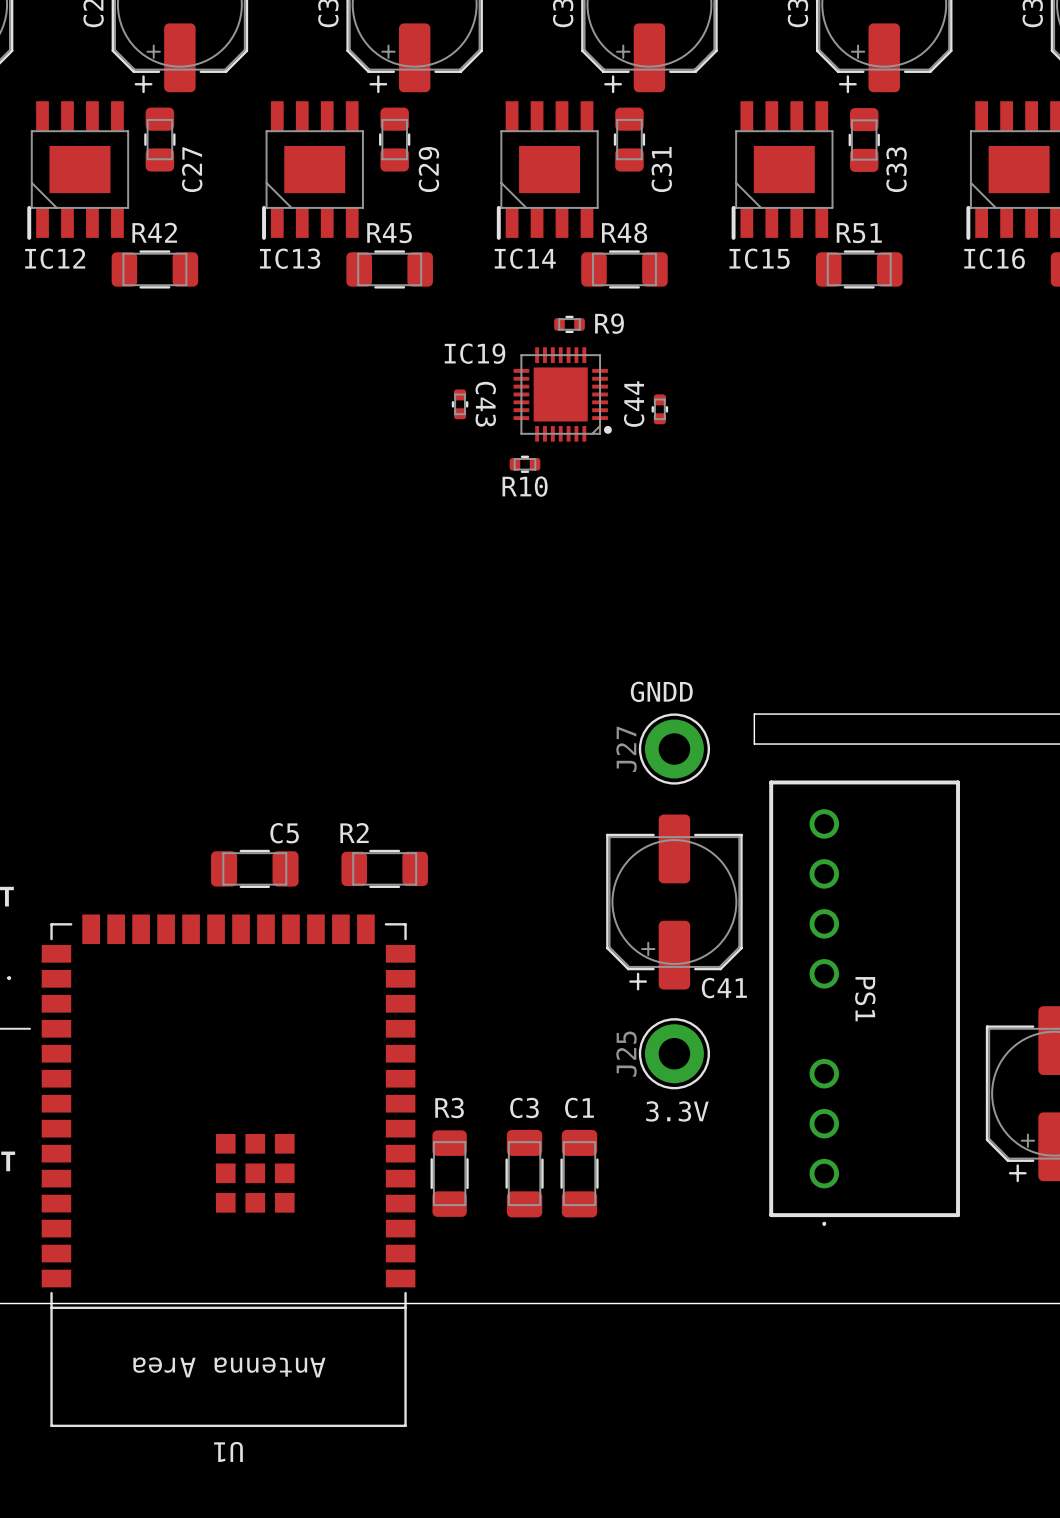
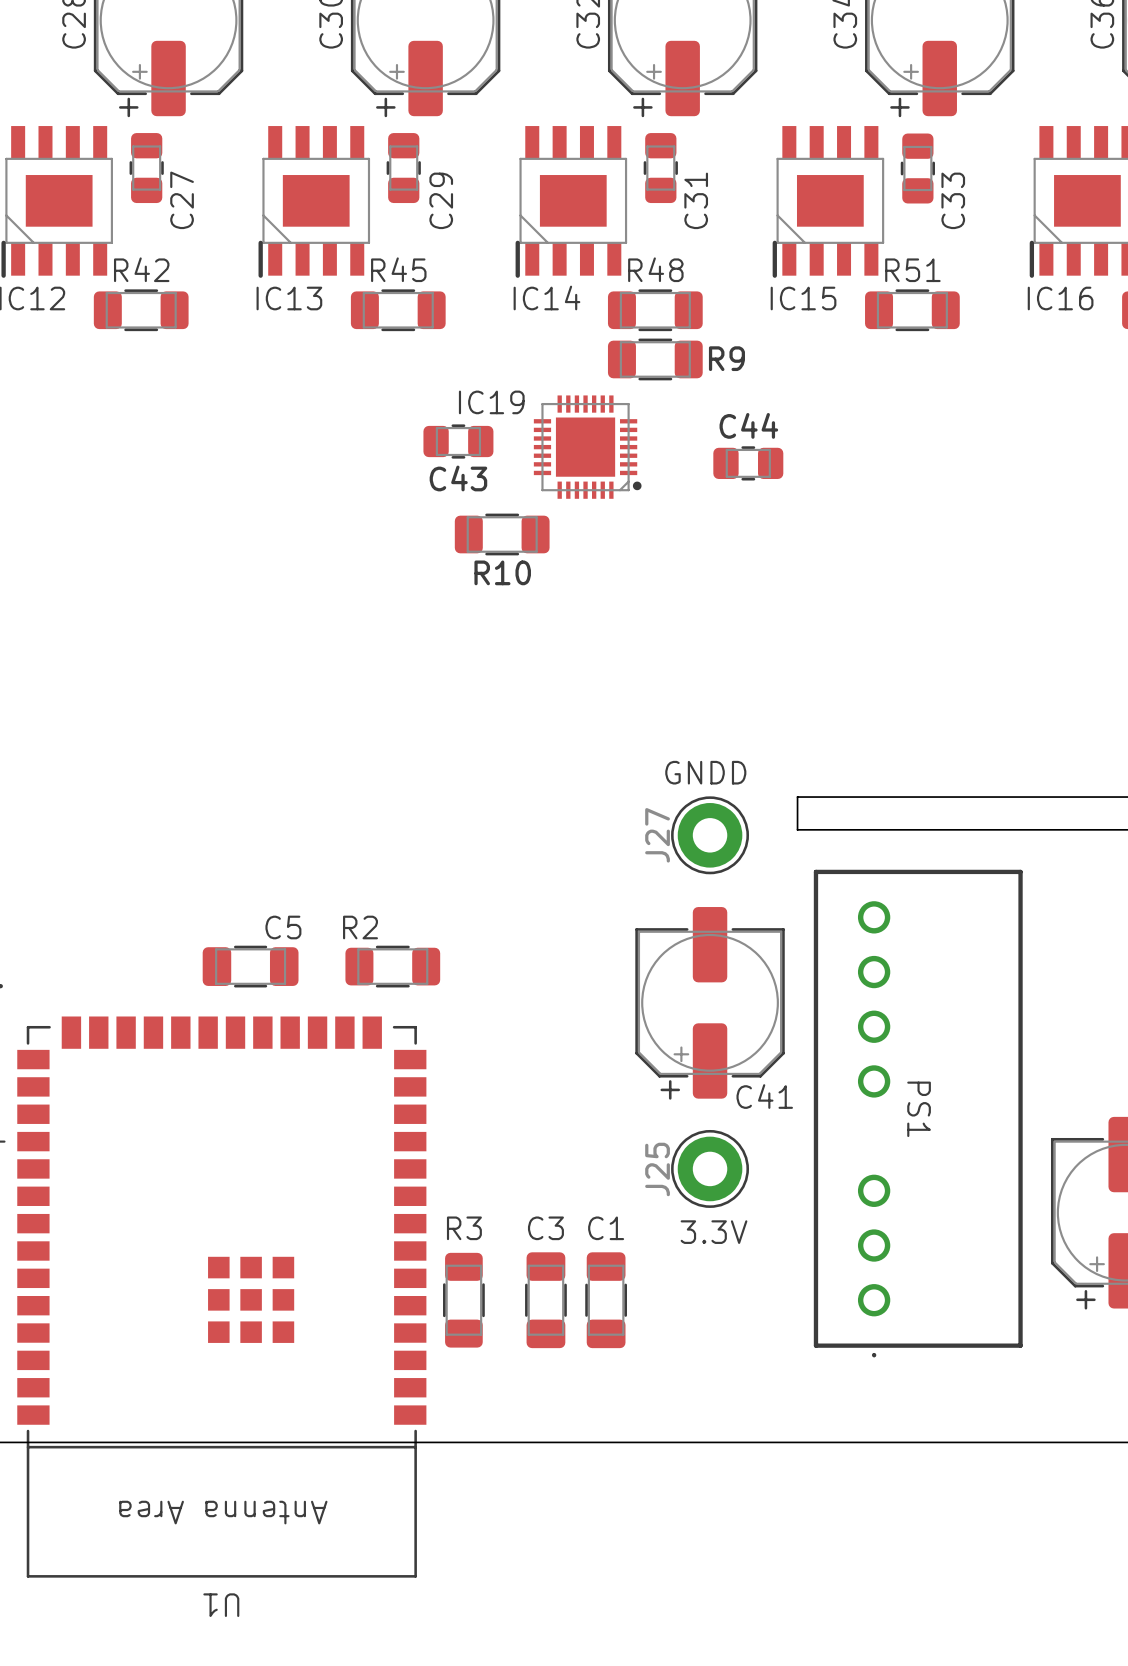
R9 footprint: [554, 315, 585, 334] -> [607, 338, 703, 381]
C43 footprint: [451, 389, 469, 420] -> [423, 424, 494, 459]
C44 footprint: [651, 394, 669, 425] -> [713, 446, 784, 481]
C43 name position: C43 (485, 404) -> C43 (458, 478)
R10 footprint: [509, 455, 541, 473] -> [454, 513, 550, 556]

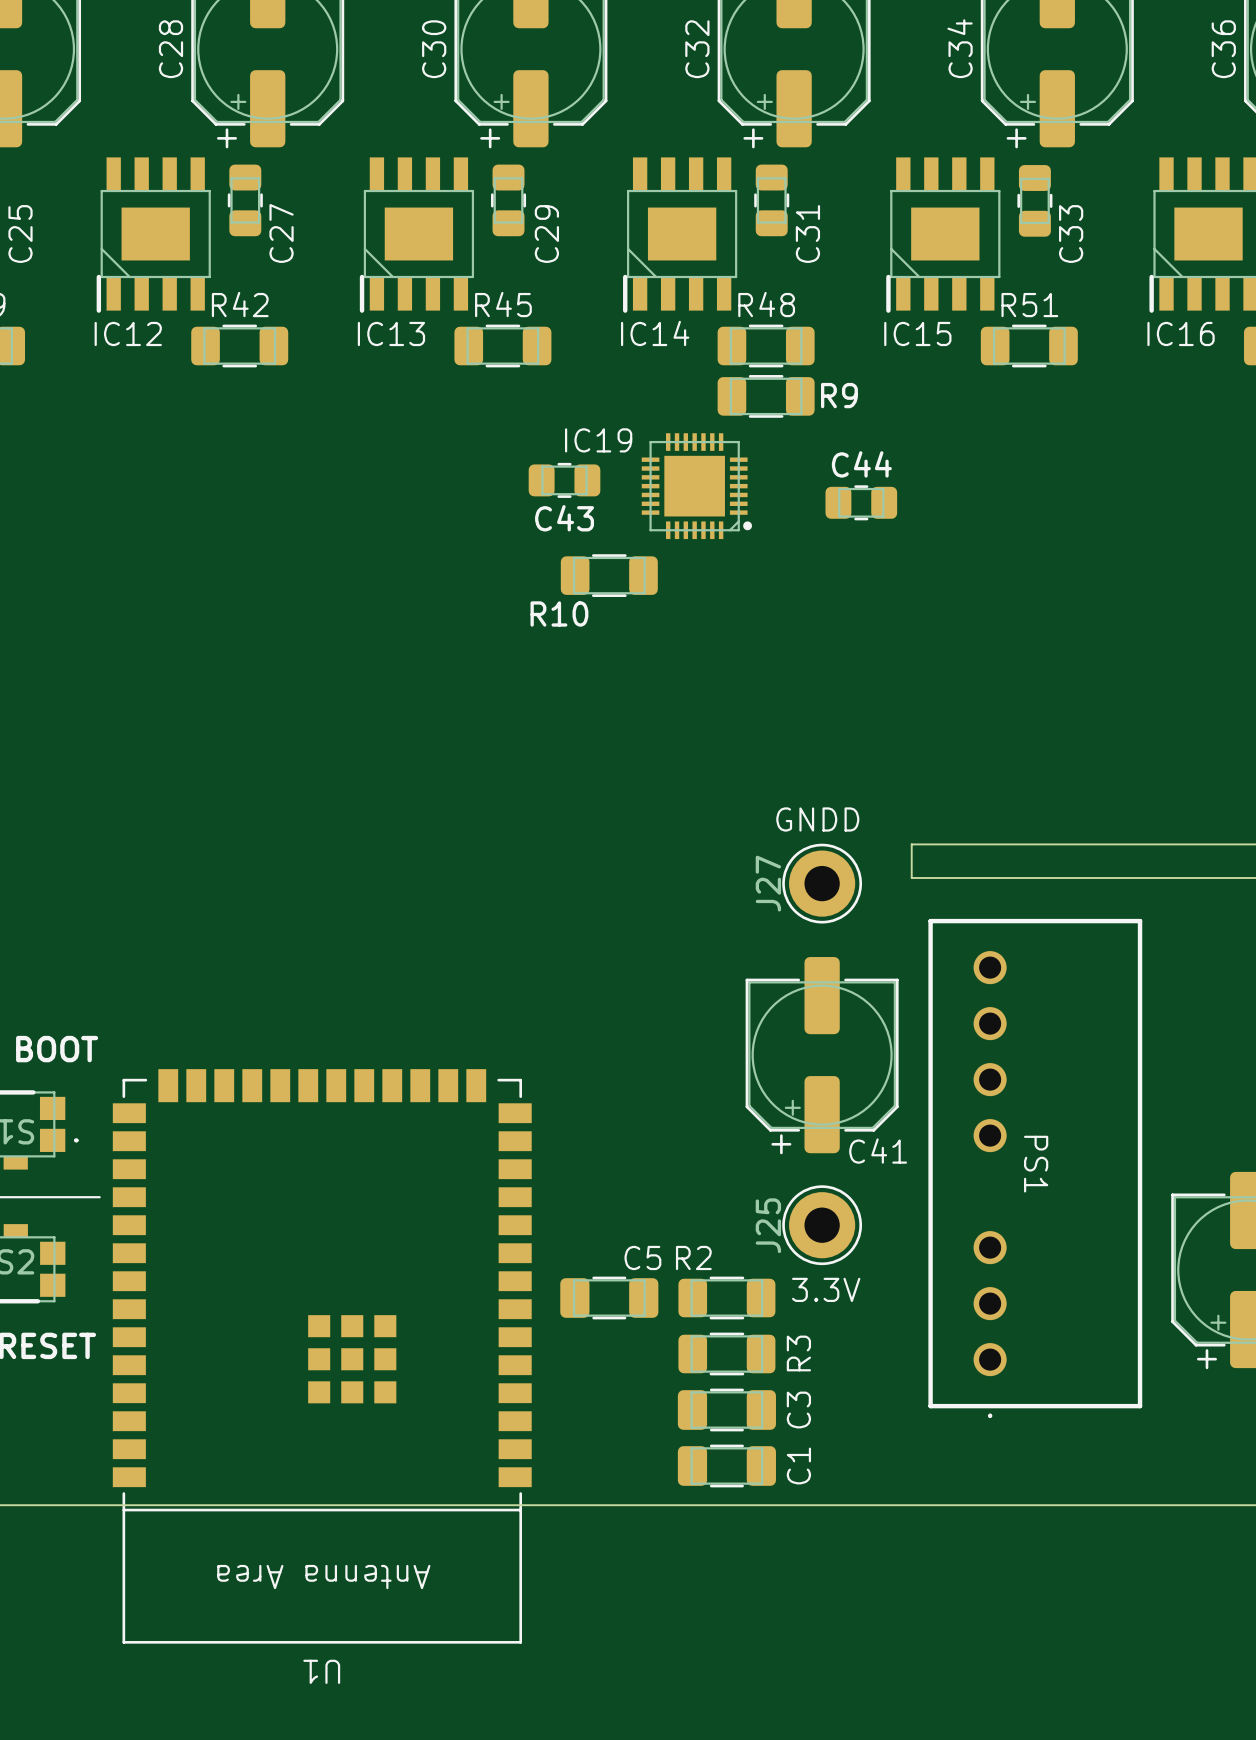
R10 name position: R10 (502, 572) -> R10 (559, 613)
C5 position: (250, 966) -> (609, 1298)
R2 position: (392, 966) -> (726, 1298)
R3 rotation: 0° (463, 1300) -> 90° clockwise (726, 1354)
R3 position: (463, 1300) -> (726, 1354)
C3 rotation: 0° (545, 1300) -> 90° clockwise (726, 1410)
C3 position: (545, 1300) -> (726, 1410)
C1 rotation: 0° (606, 1300) -> 90° clockwise (726, 1466)
C1 position: (606, 1300) -> (726, 1466)

